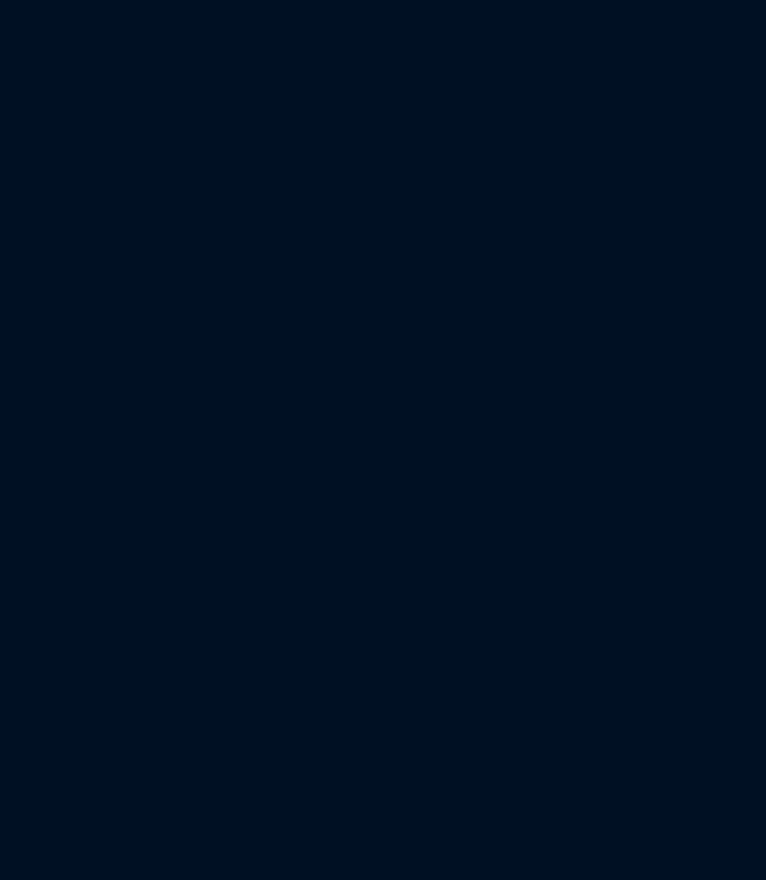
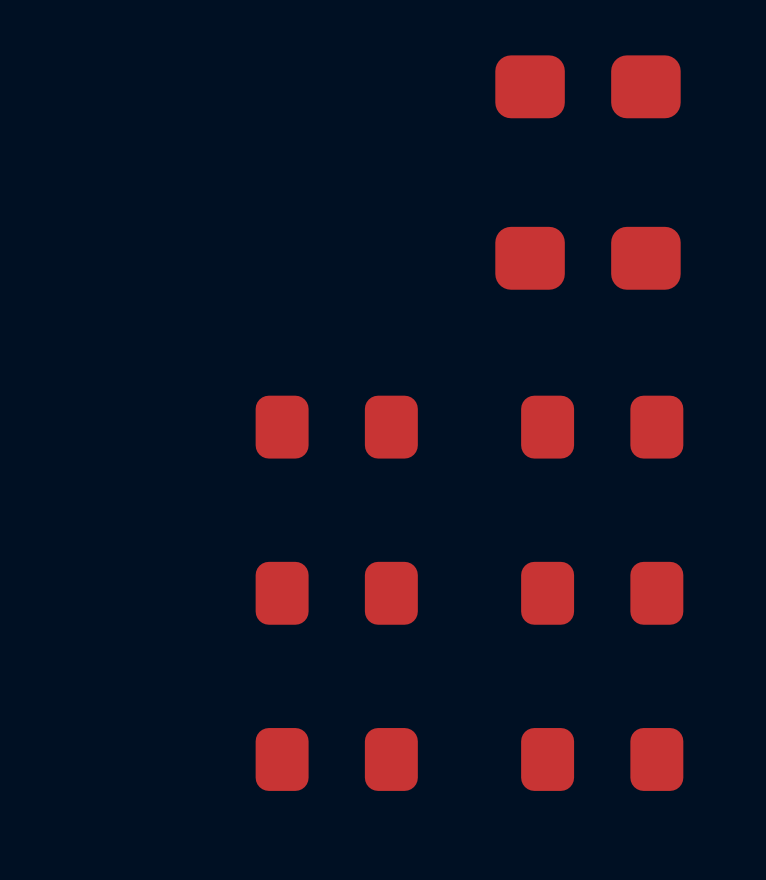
part: none -> (587, 86)
part: none -> (587, 258)
part: none -> (336, 427)
part: none -> (602, 427)
part: none -> (336, 593)
part: none -> (602, 593)
part: none -> (336, 759)
part: none -> (602, 759)

